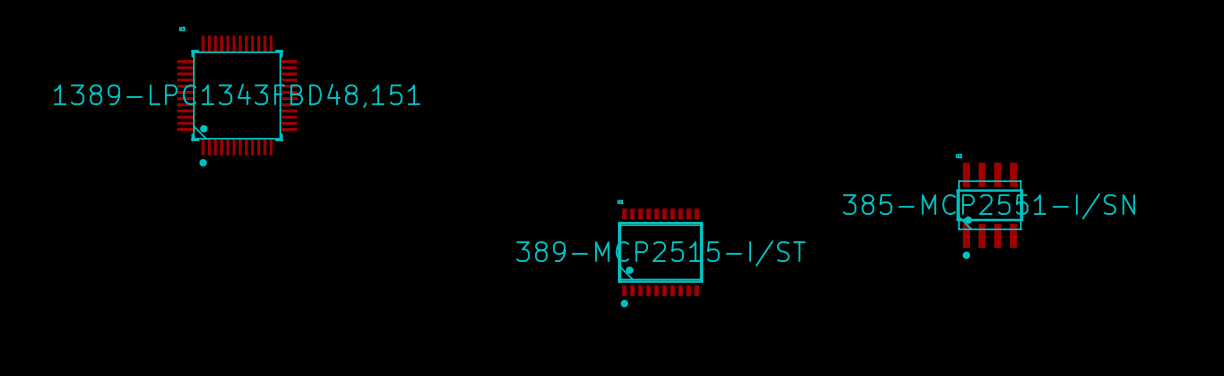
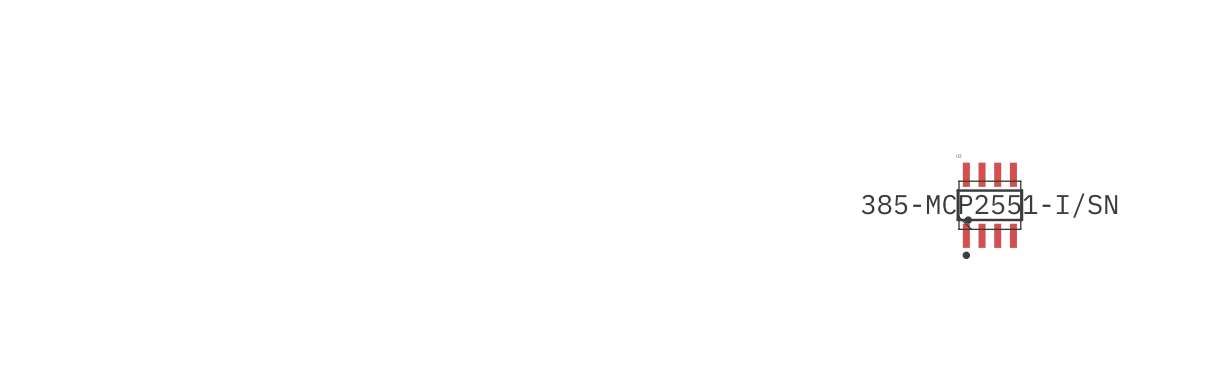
part: 1389-LPC1343FBD48,151 (237, 101) -> none
part: 389-MCP2515-I/ST (660, 257) -> none

